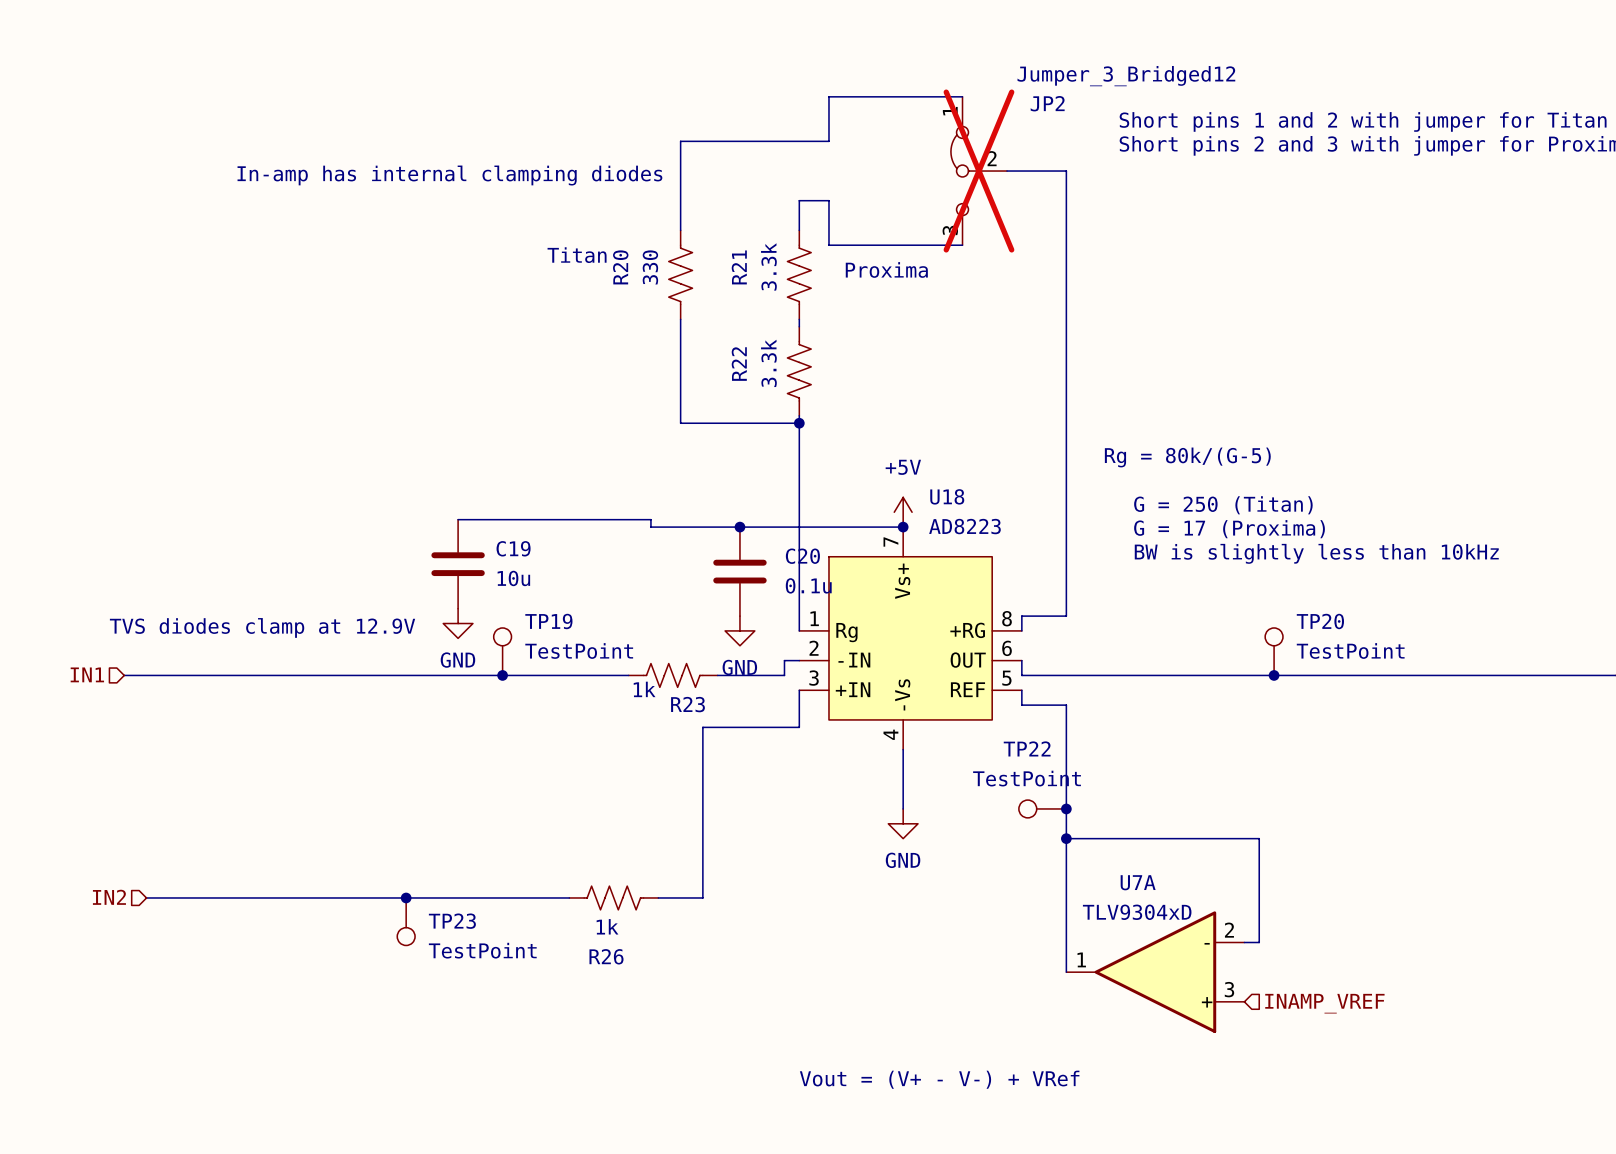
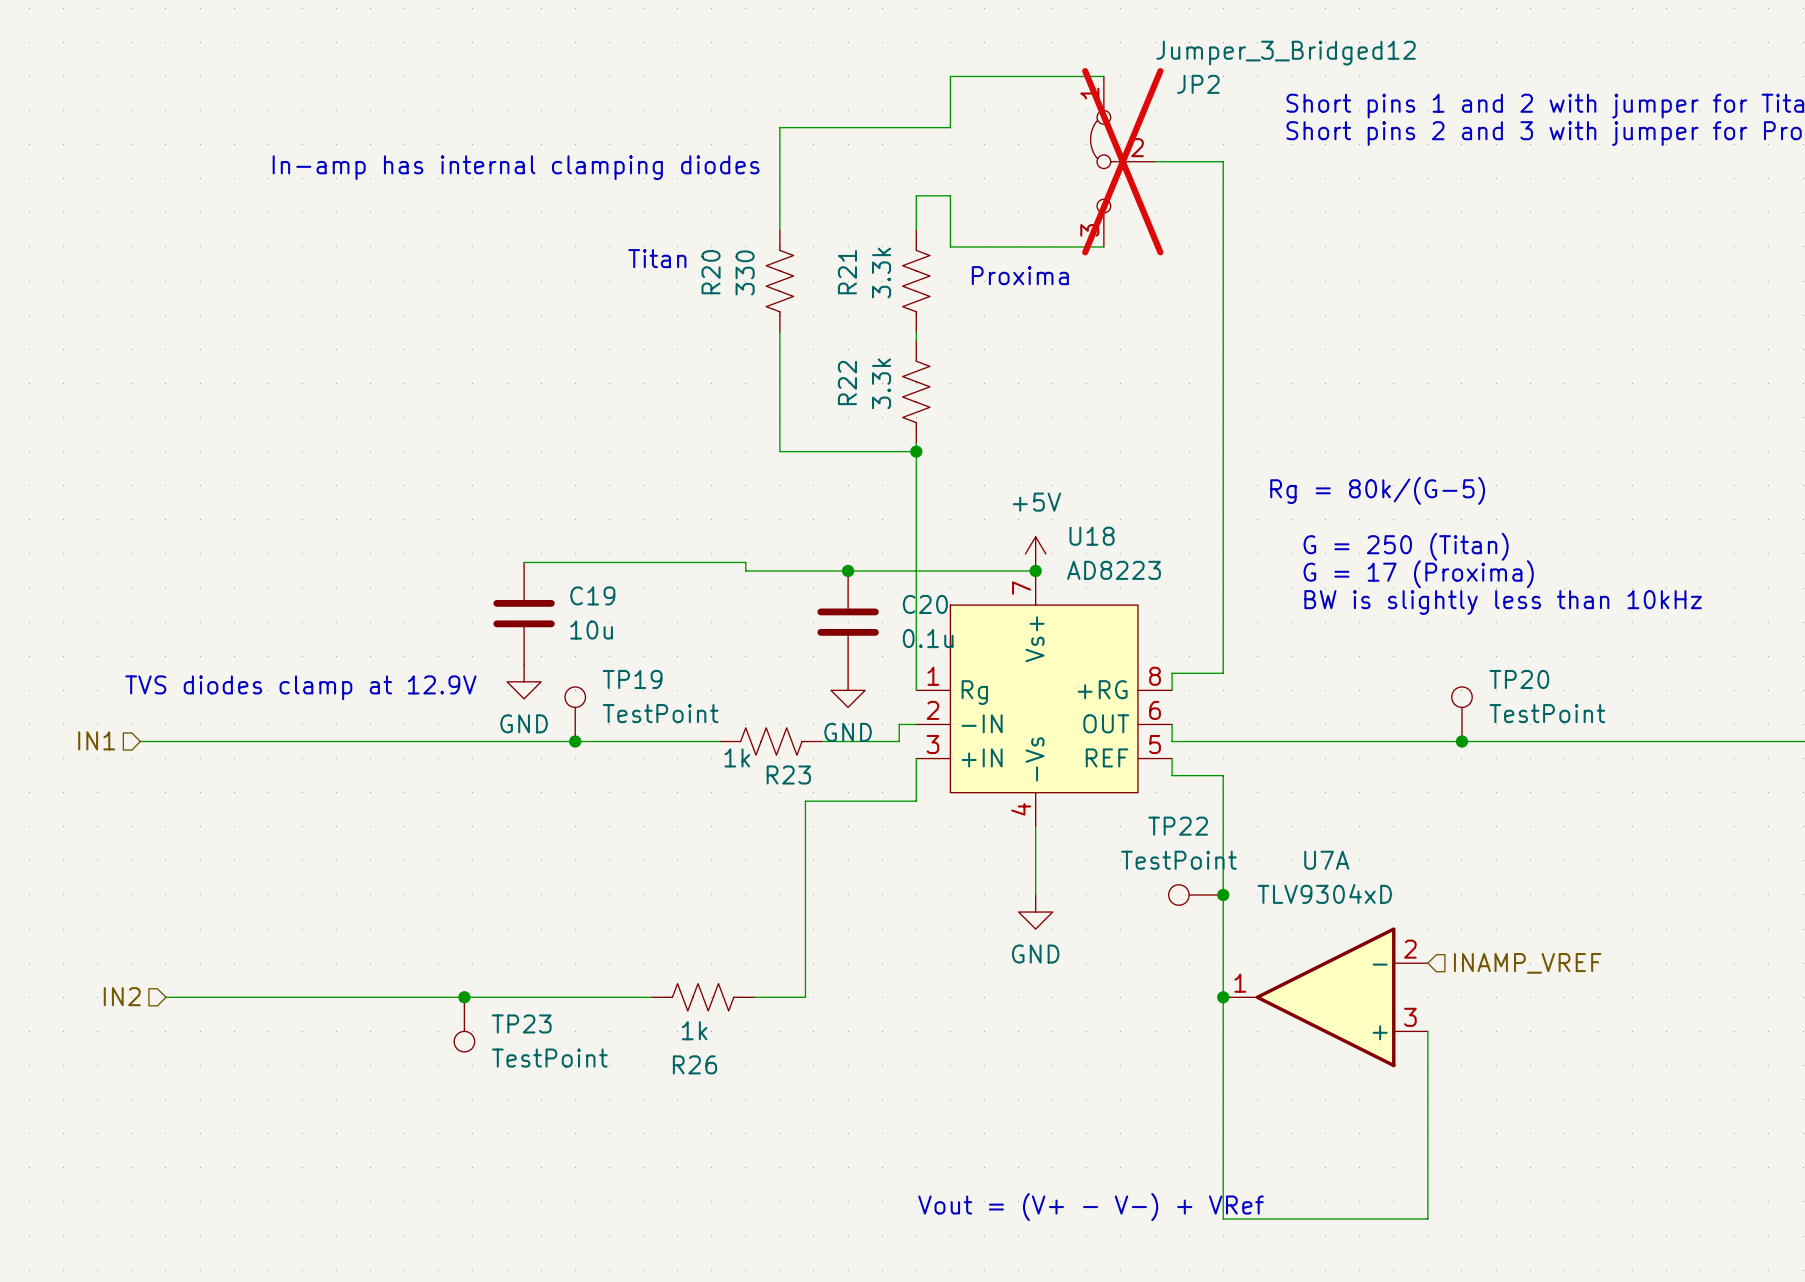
wire: (1066, 838) (1259, 838) (1259, 942) (1244, 942) -> none
junction position: (1066, 838) -> (1223, 997)
U7A name position: U7A (1138, 882) -> U7A (1326, 860)
U7A value position: TLV9304xD (1137, 912) -> TLV9304xD (1324, 893)
wire: none -> (1427, 1031) (1427, 1218) (1223, 1218) (1223, 1082)
U7A position: (1155, 972) -> (1325, 997)
hierarchical label position: INAMP_VREF (1324, 1003) -> INAMP_VREF (1527, 963)

